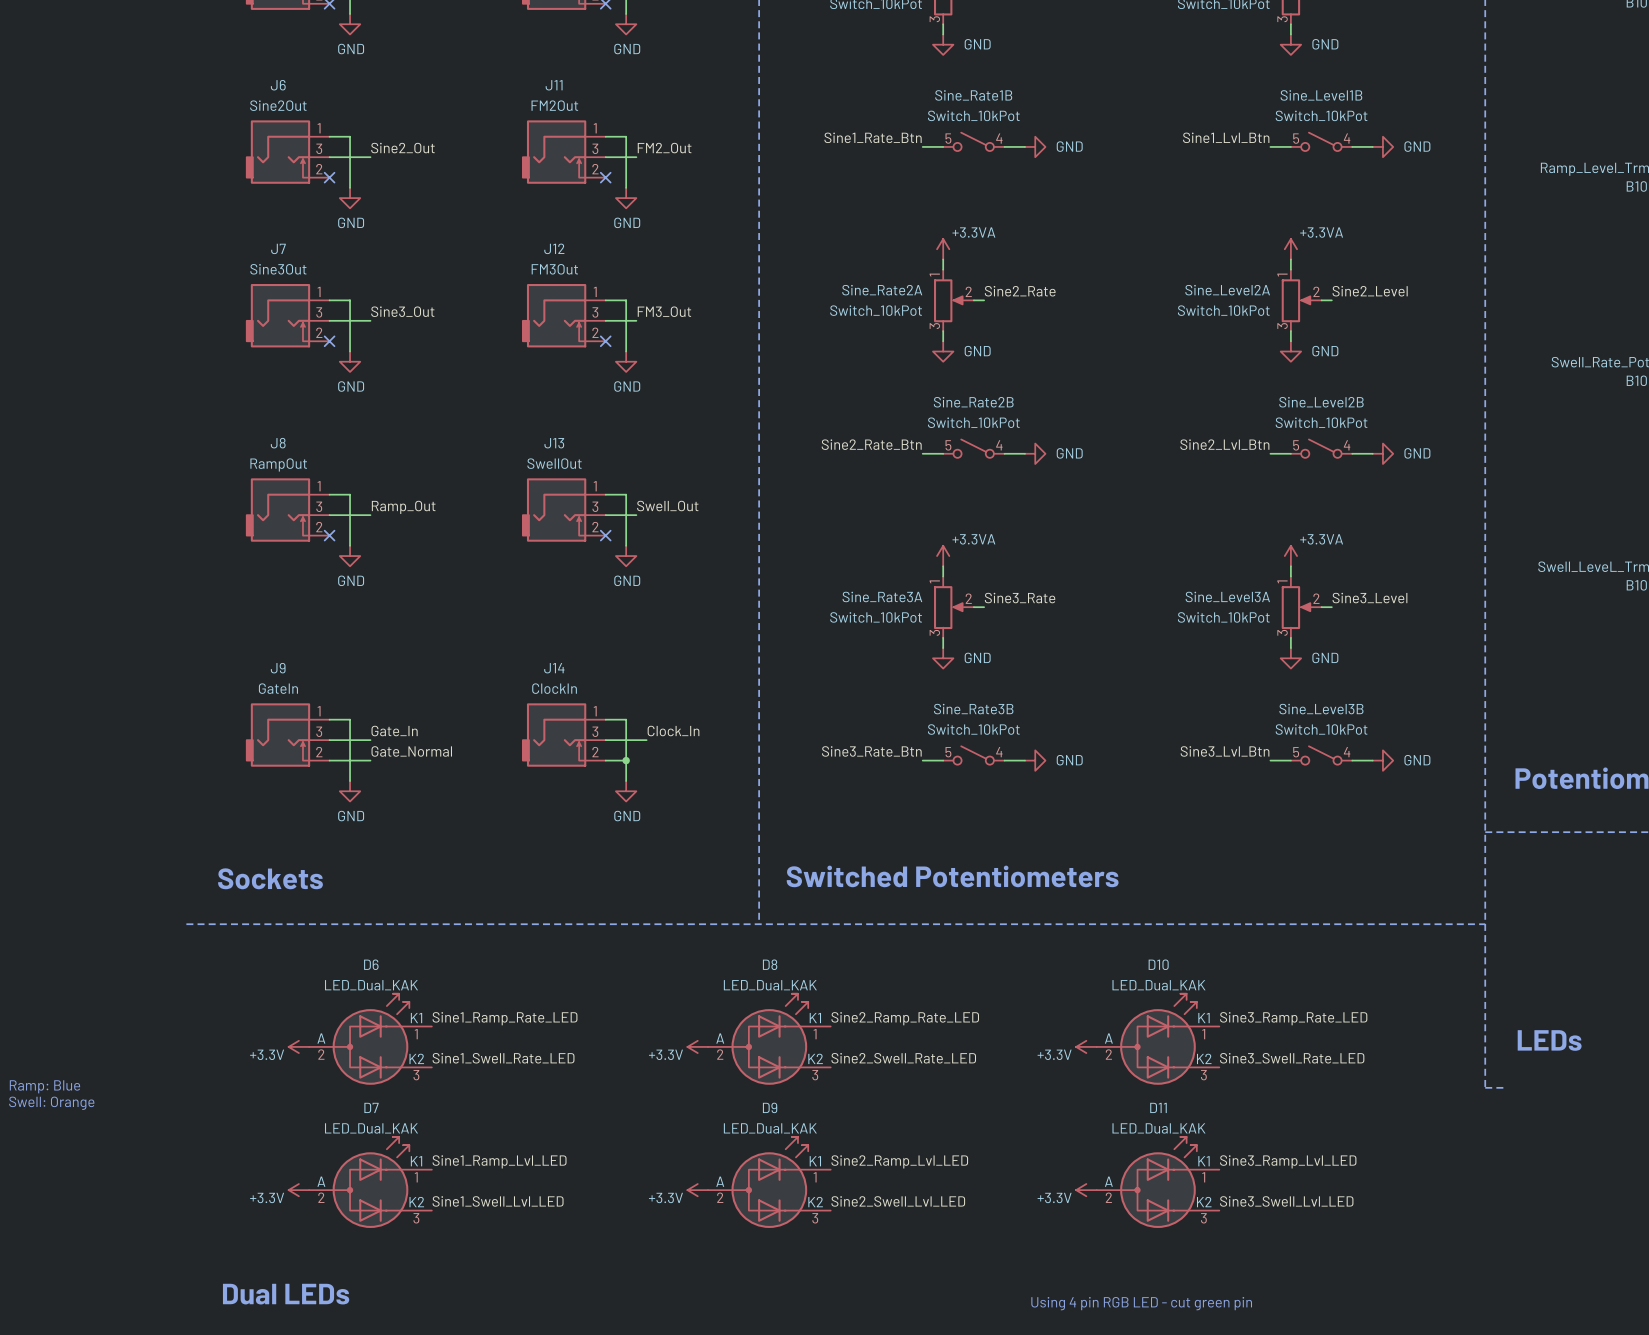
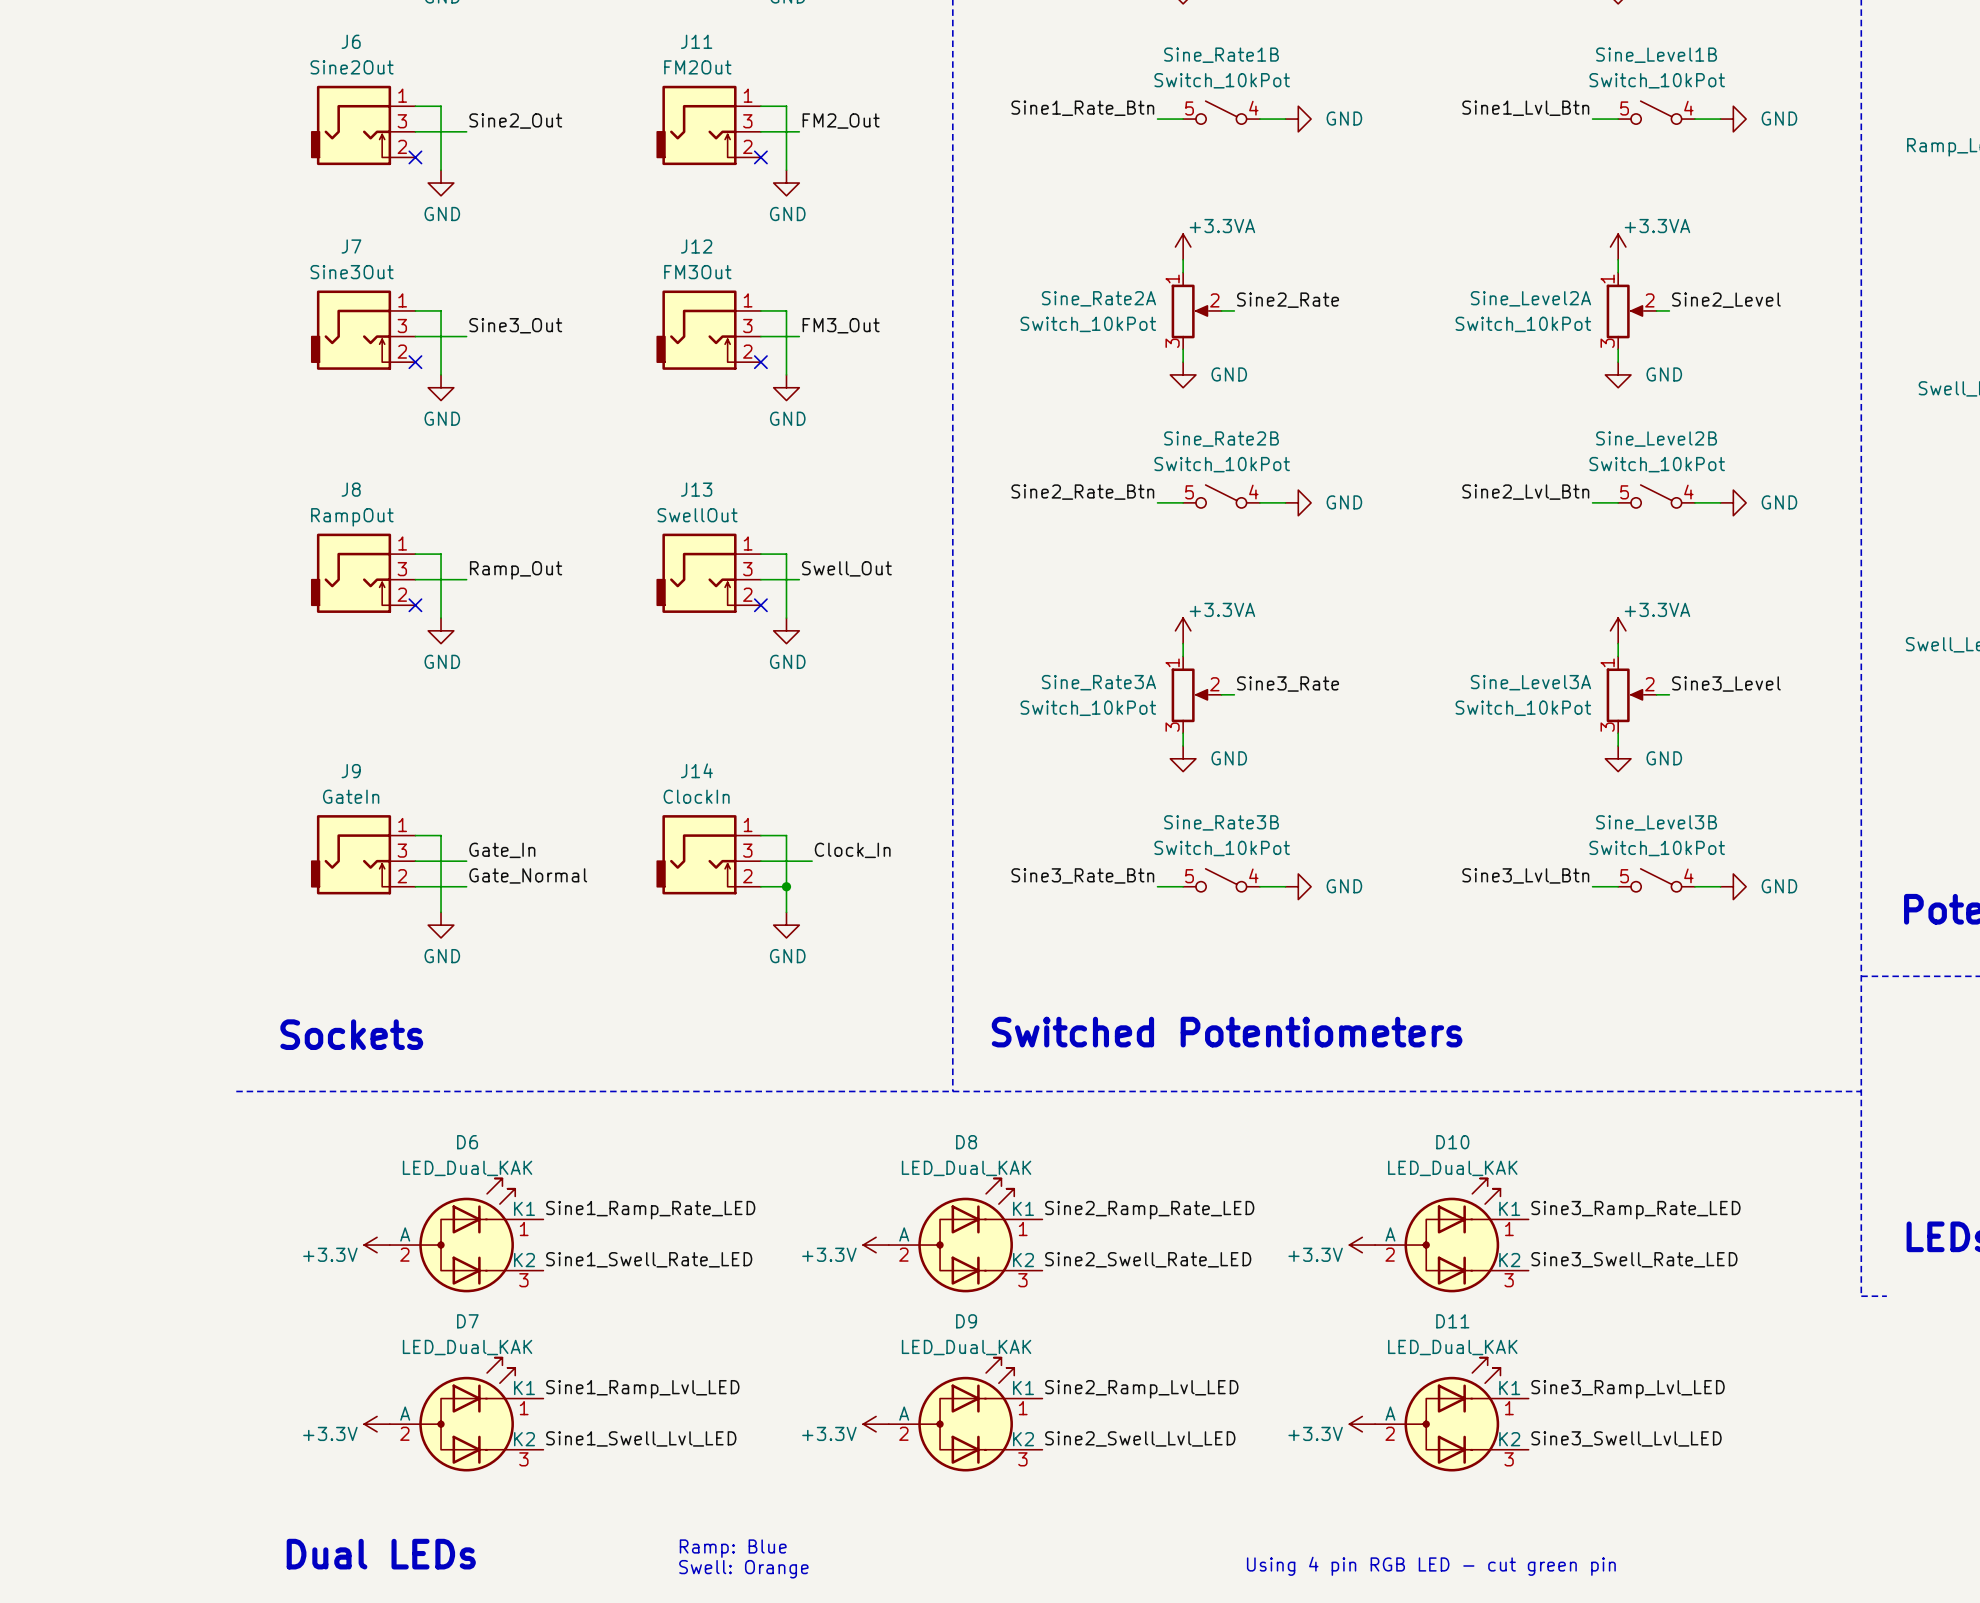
text: Ramp: Blue (44, 1086) -> none
text: Swell: Orange (51, 1103) -> none
text: none -> Ramp: Blue (733, 1548)
text: none -> Swell: Orange (743, 1569)

